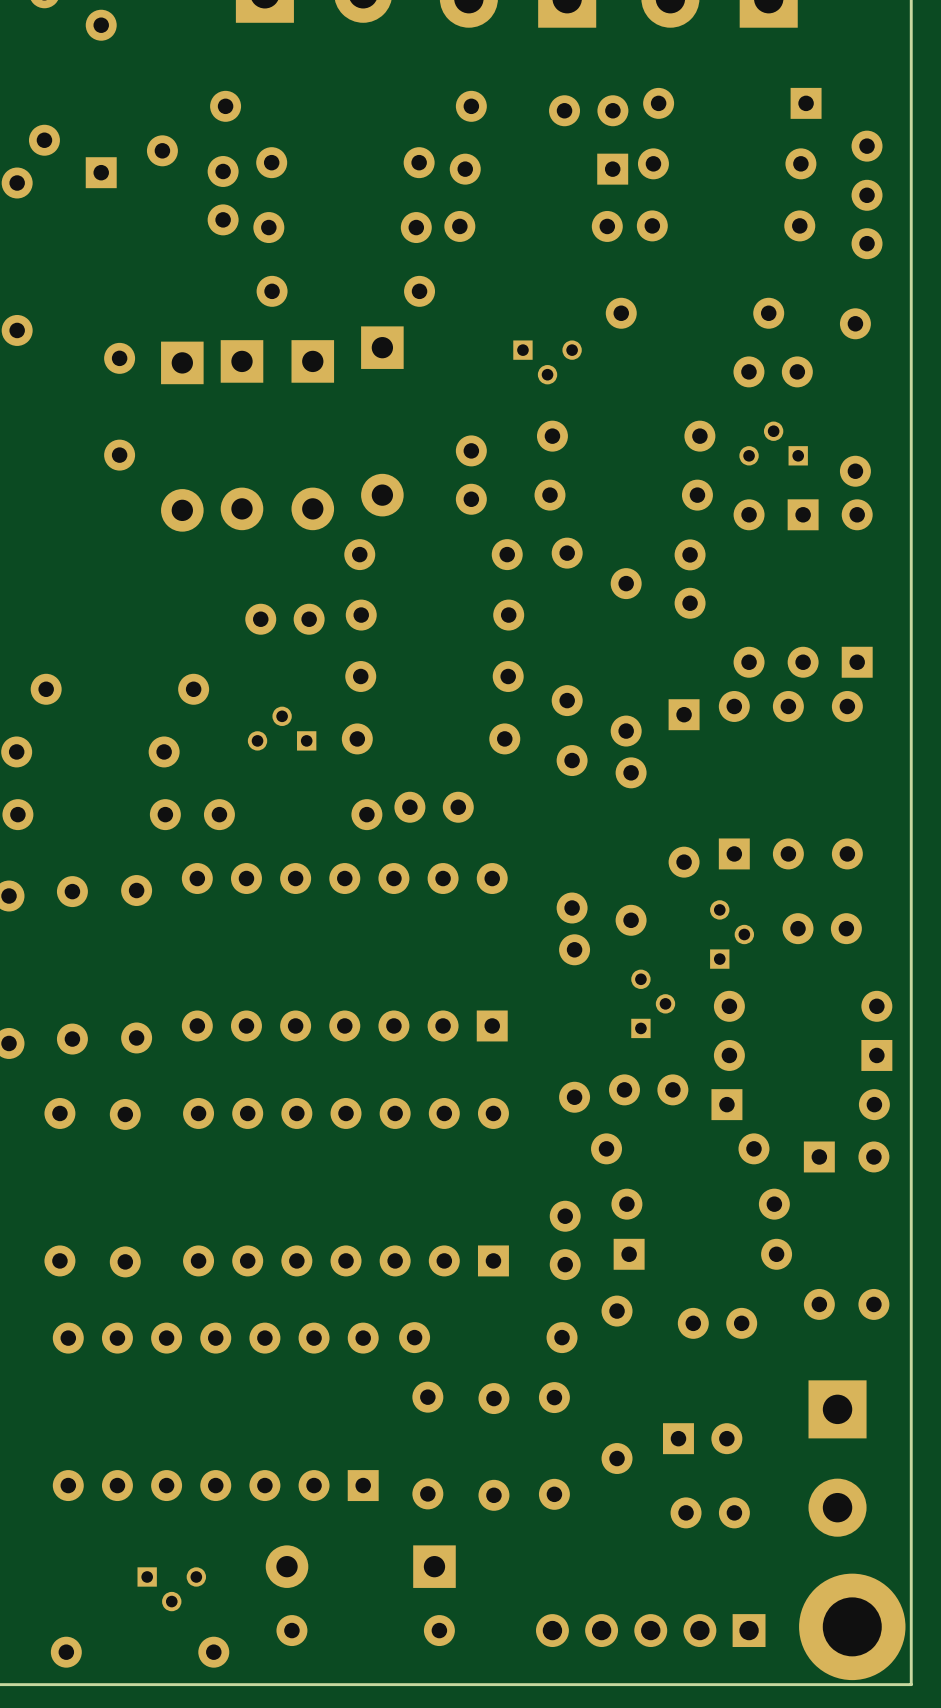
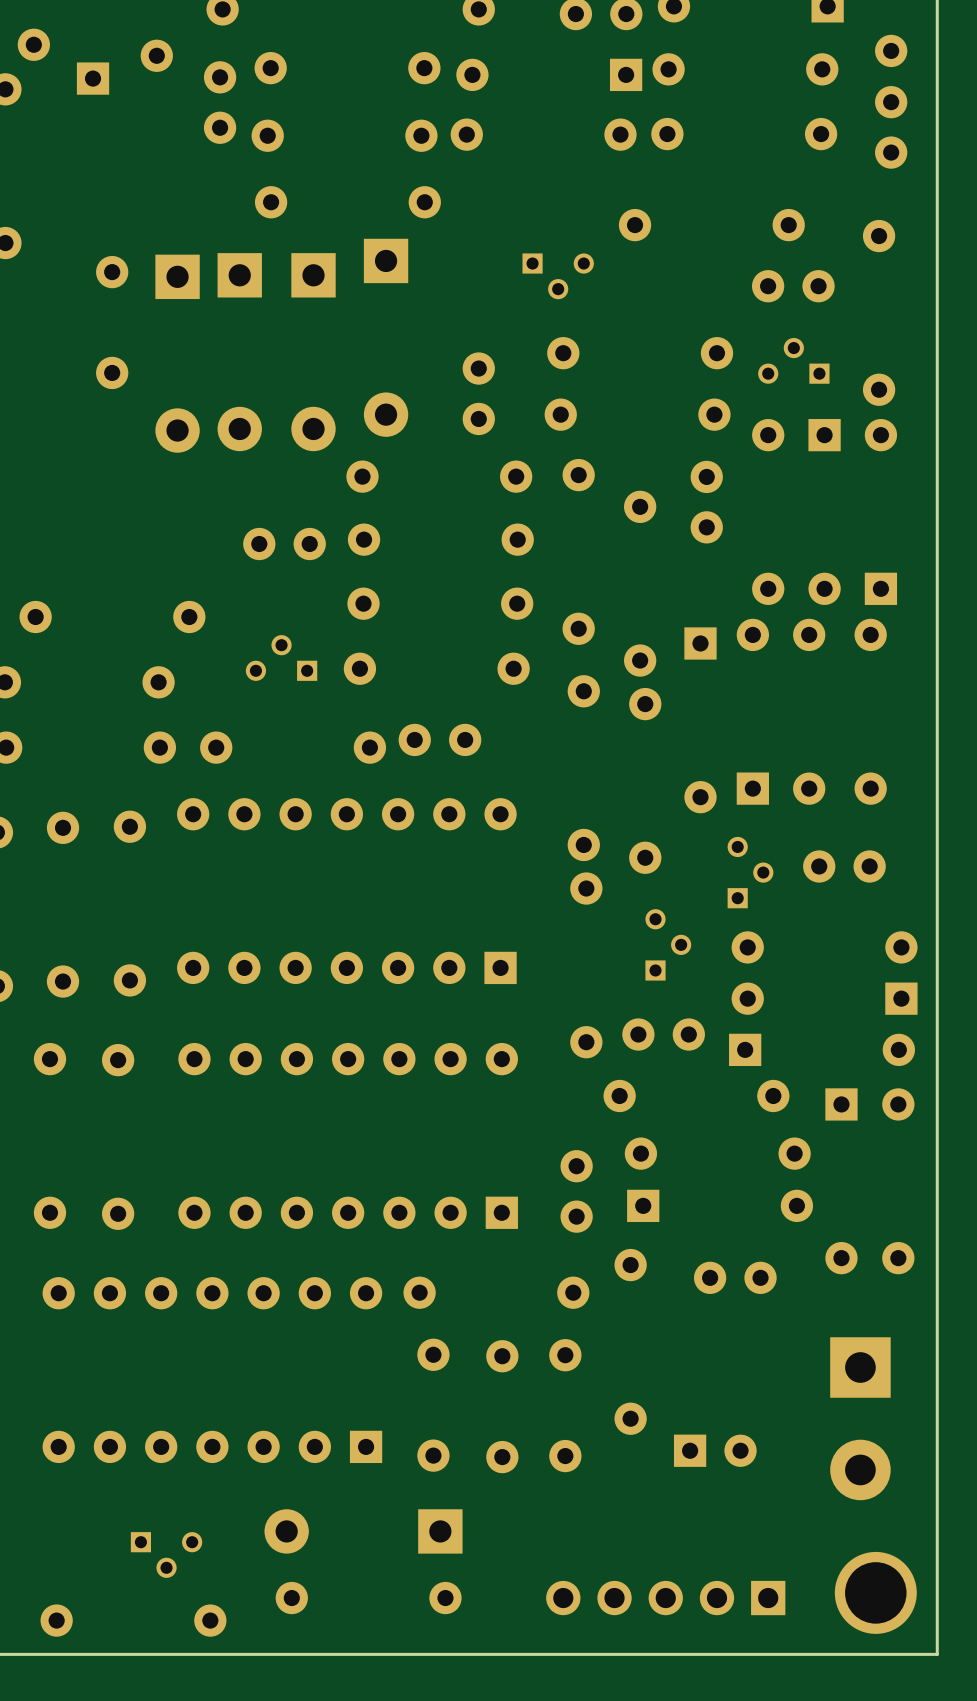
part position: (702, 1438) -> (715, 1450)
part: (710, 1512) -> none
part footprint: [799, 1573, 906, 1681] -> [834, 1551, 917, 1634]

